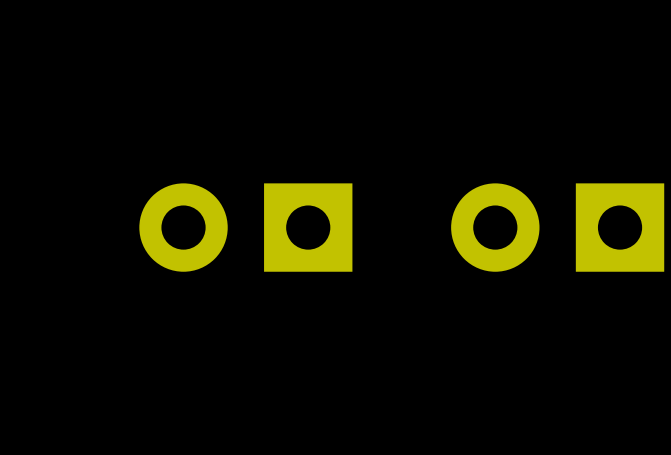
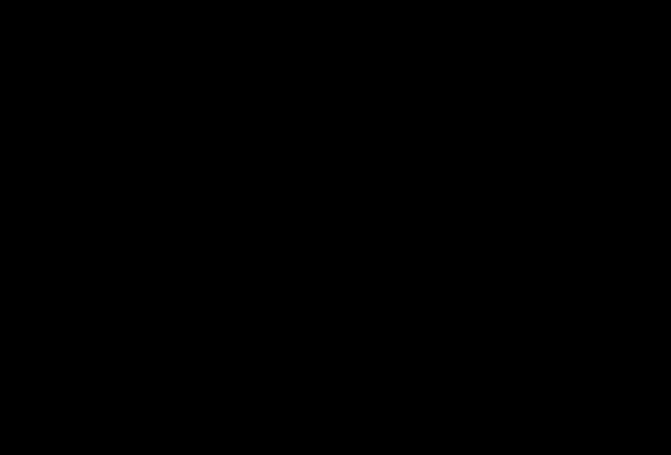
part: (245, 227) -> none
part: (557, 227) -> none

